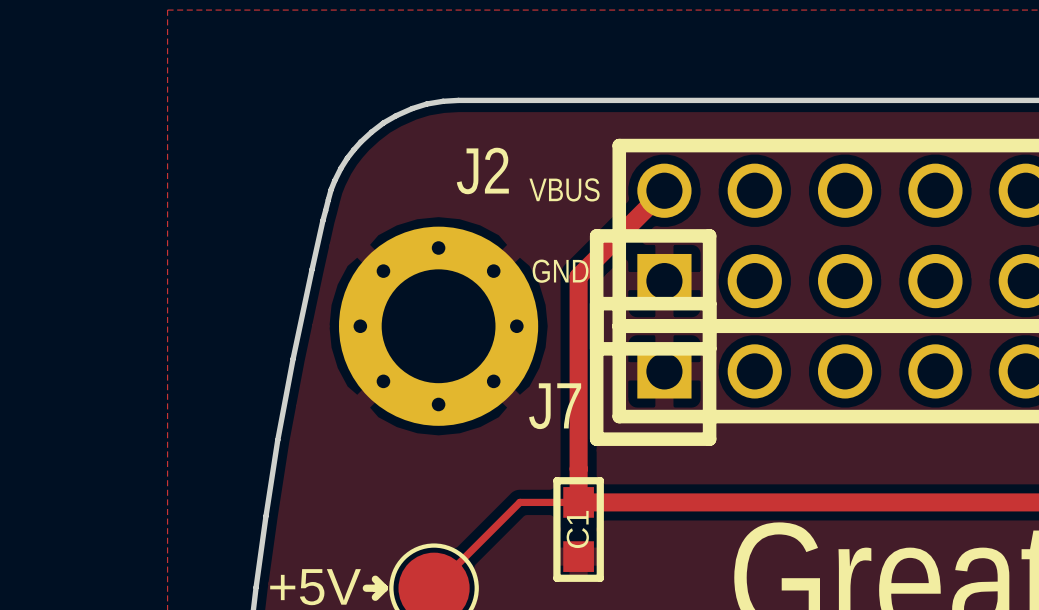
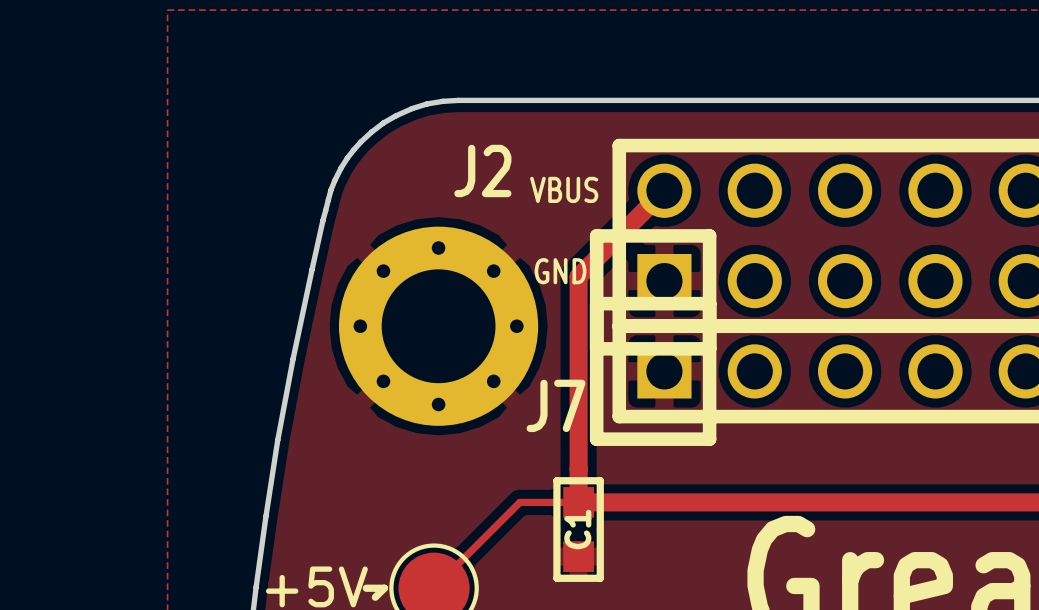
line: (375, 579) (384, 588) -> none

